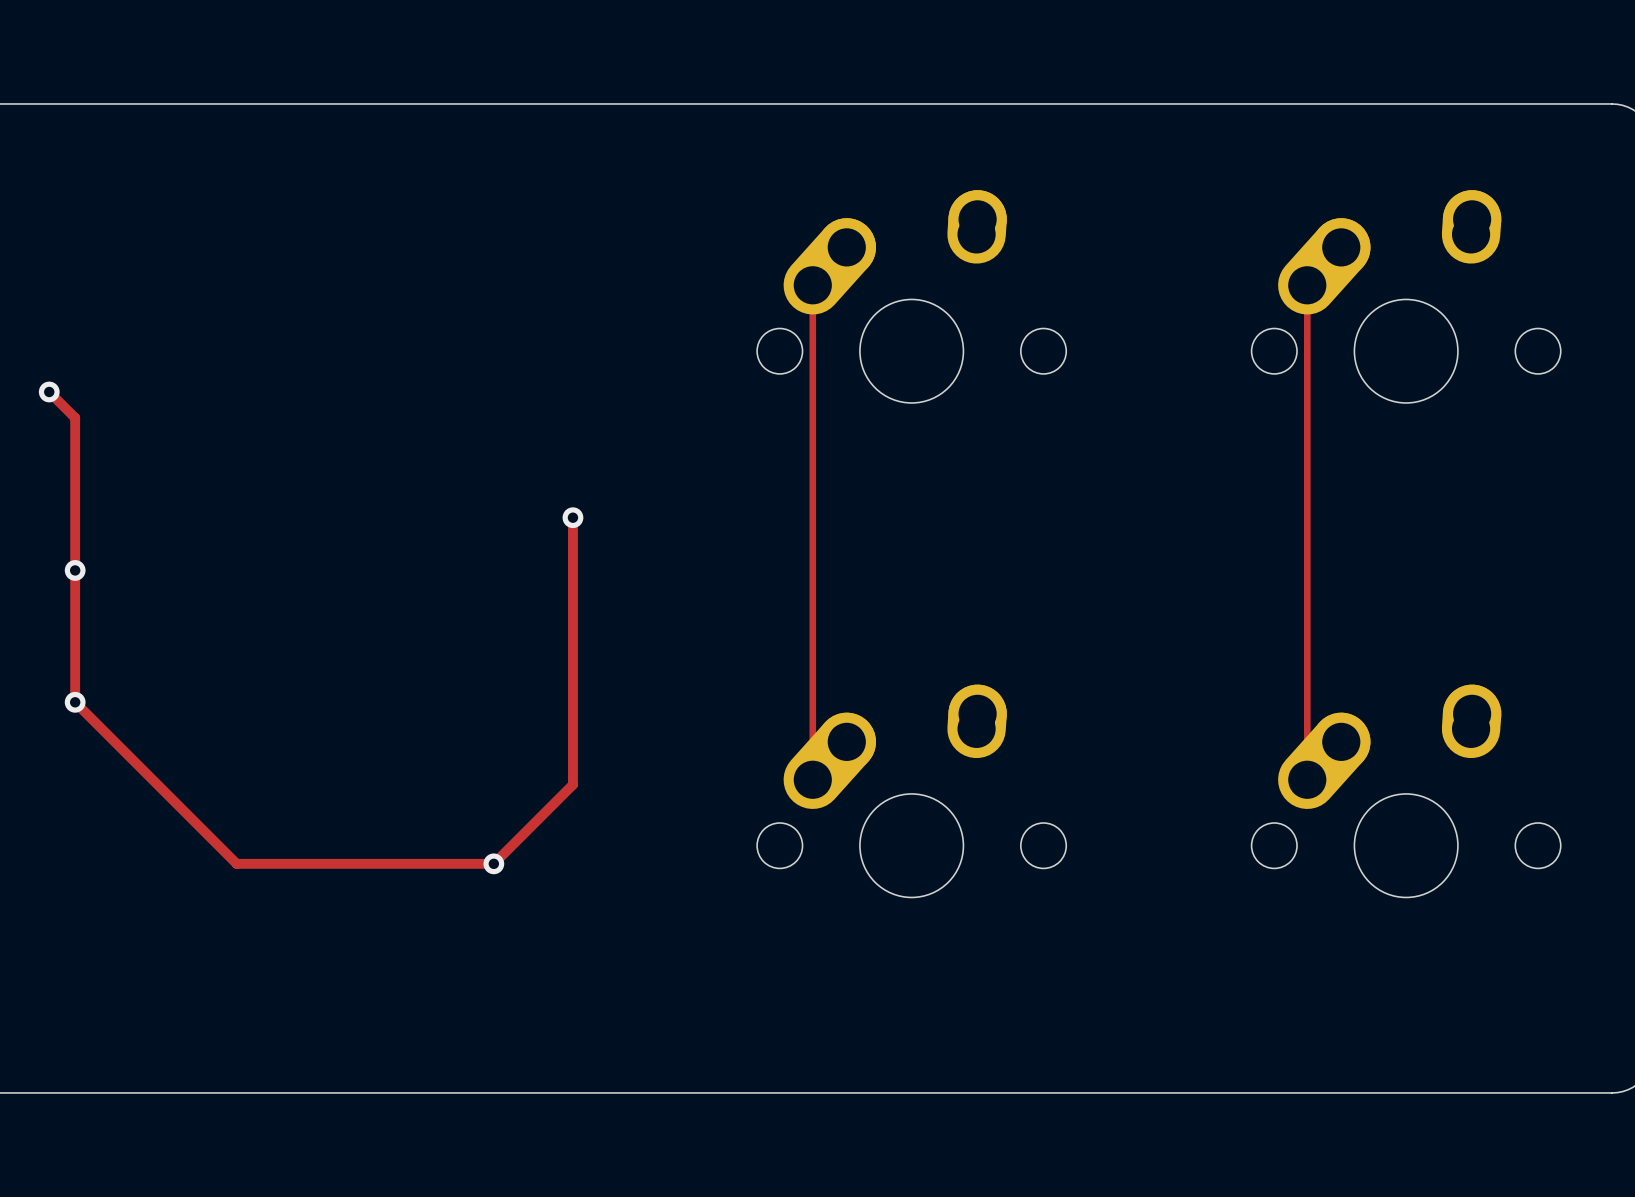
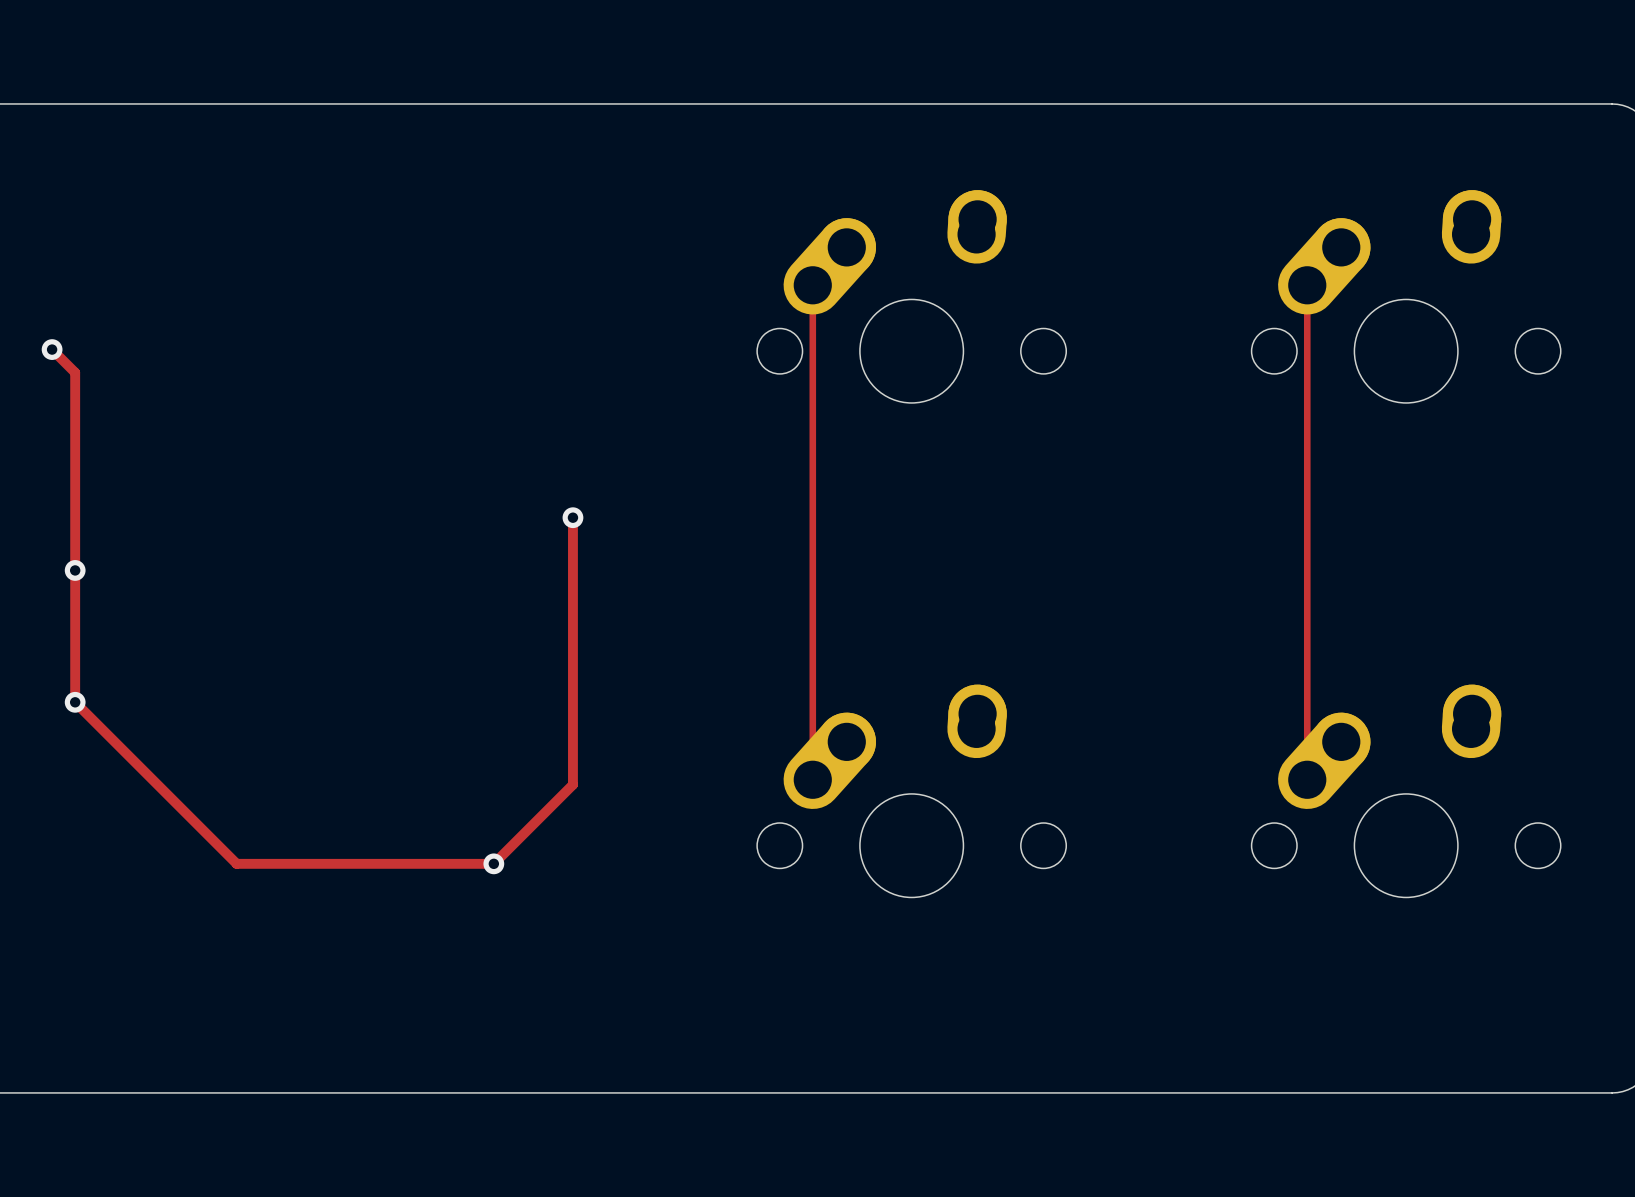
via: none -> (52, 349)
track: (49, 391) (75, 417) -> (52, 349) (75, 372) (75, 417)
via: (49, 391) -> none

